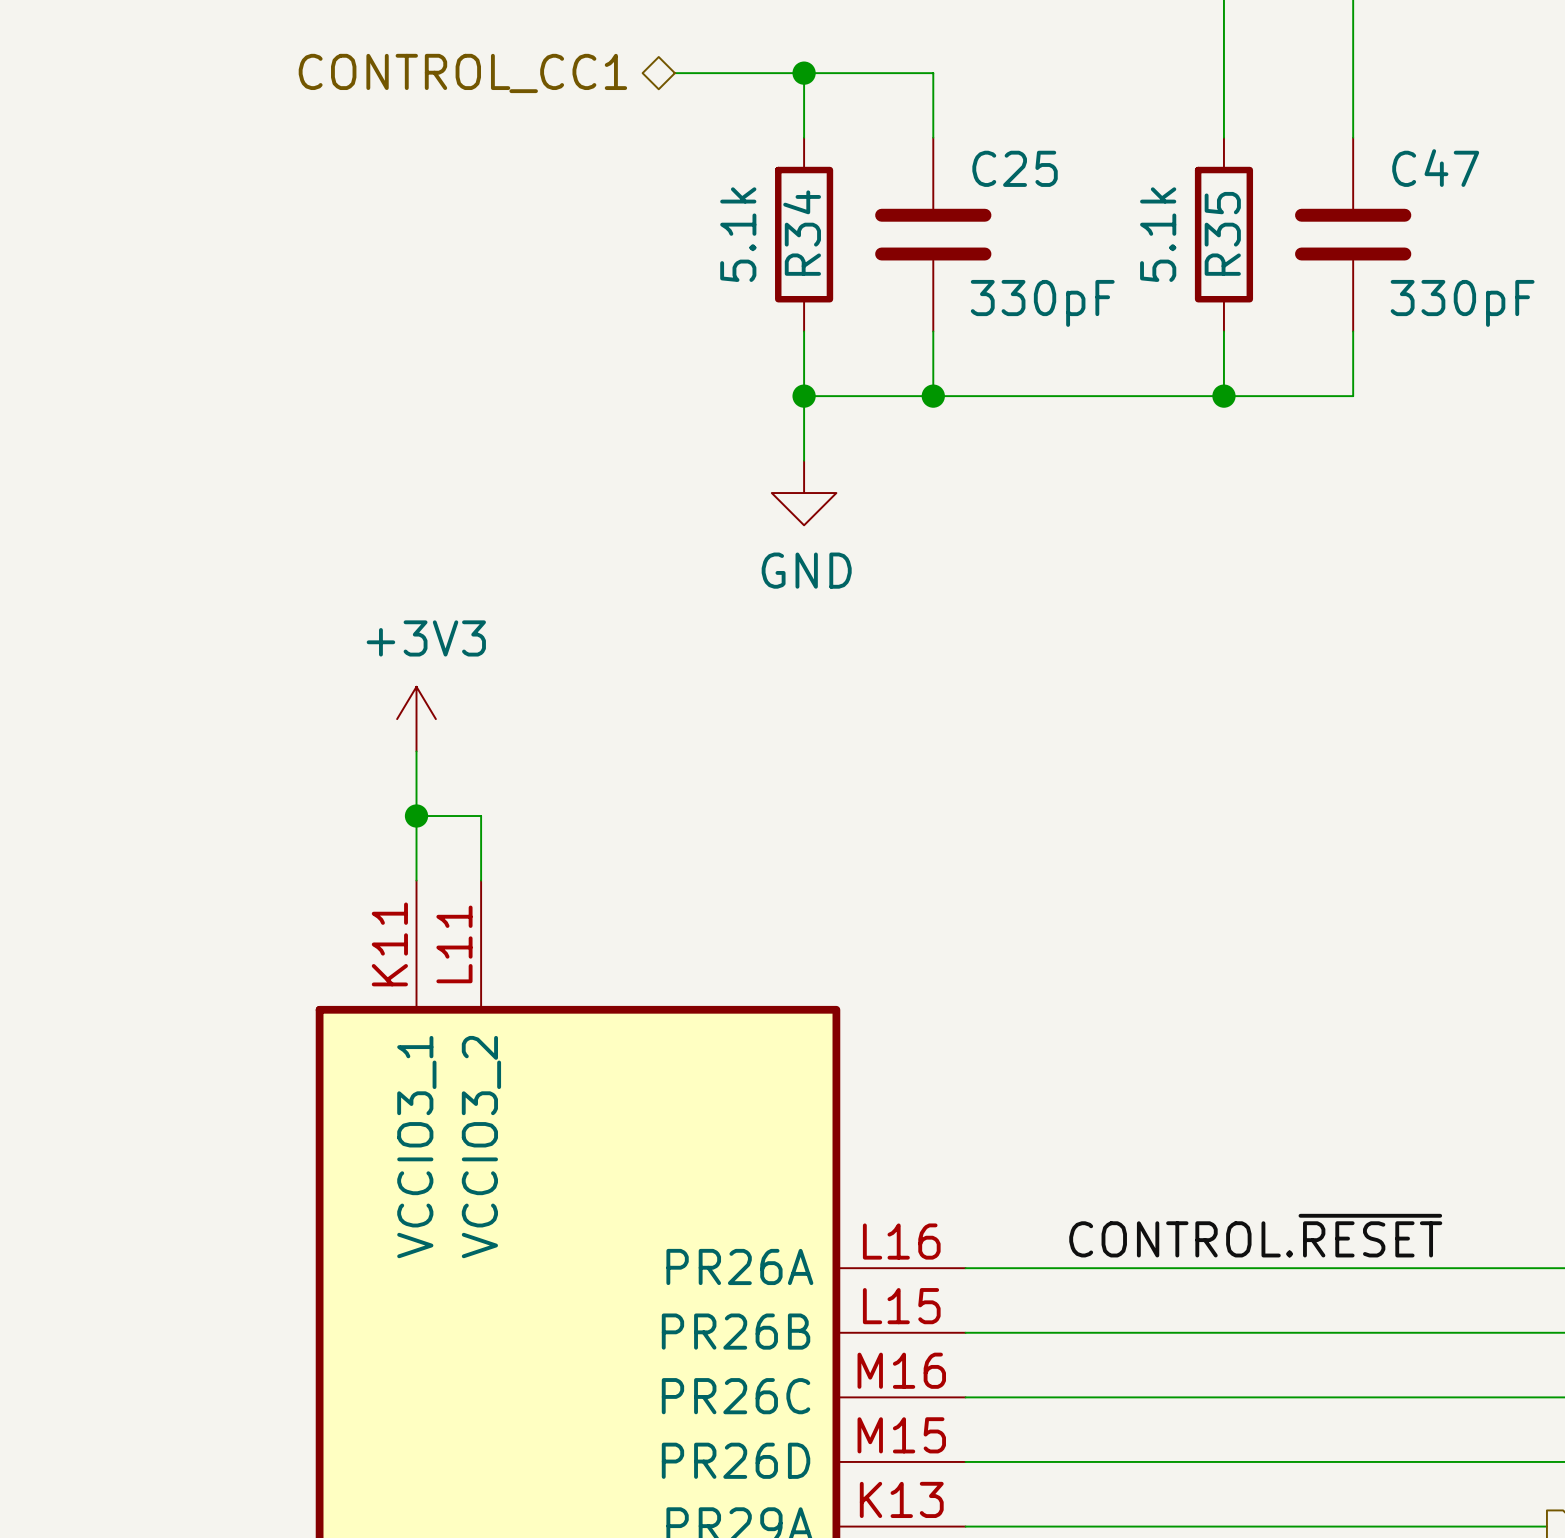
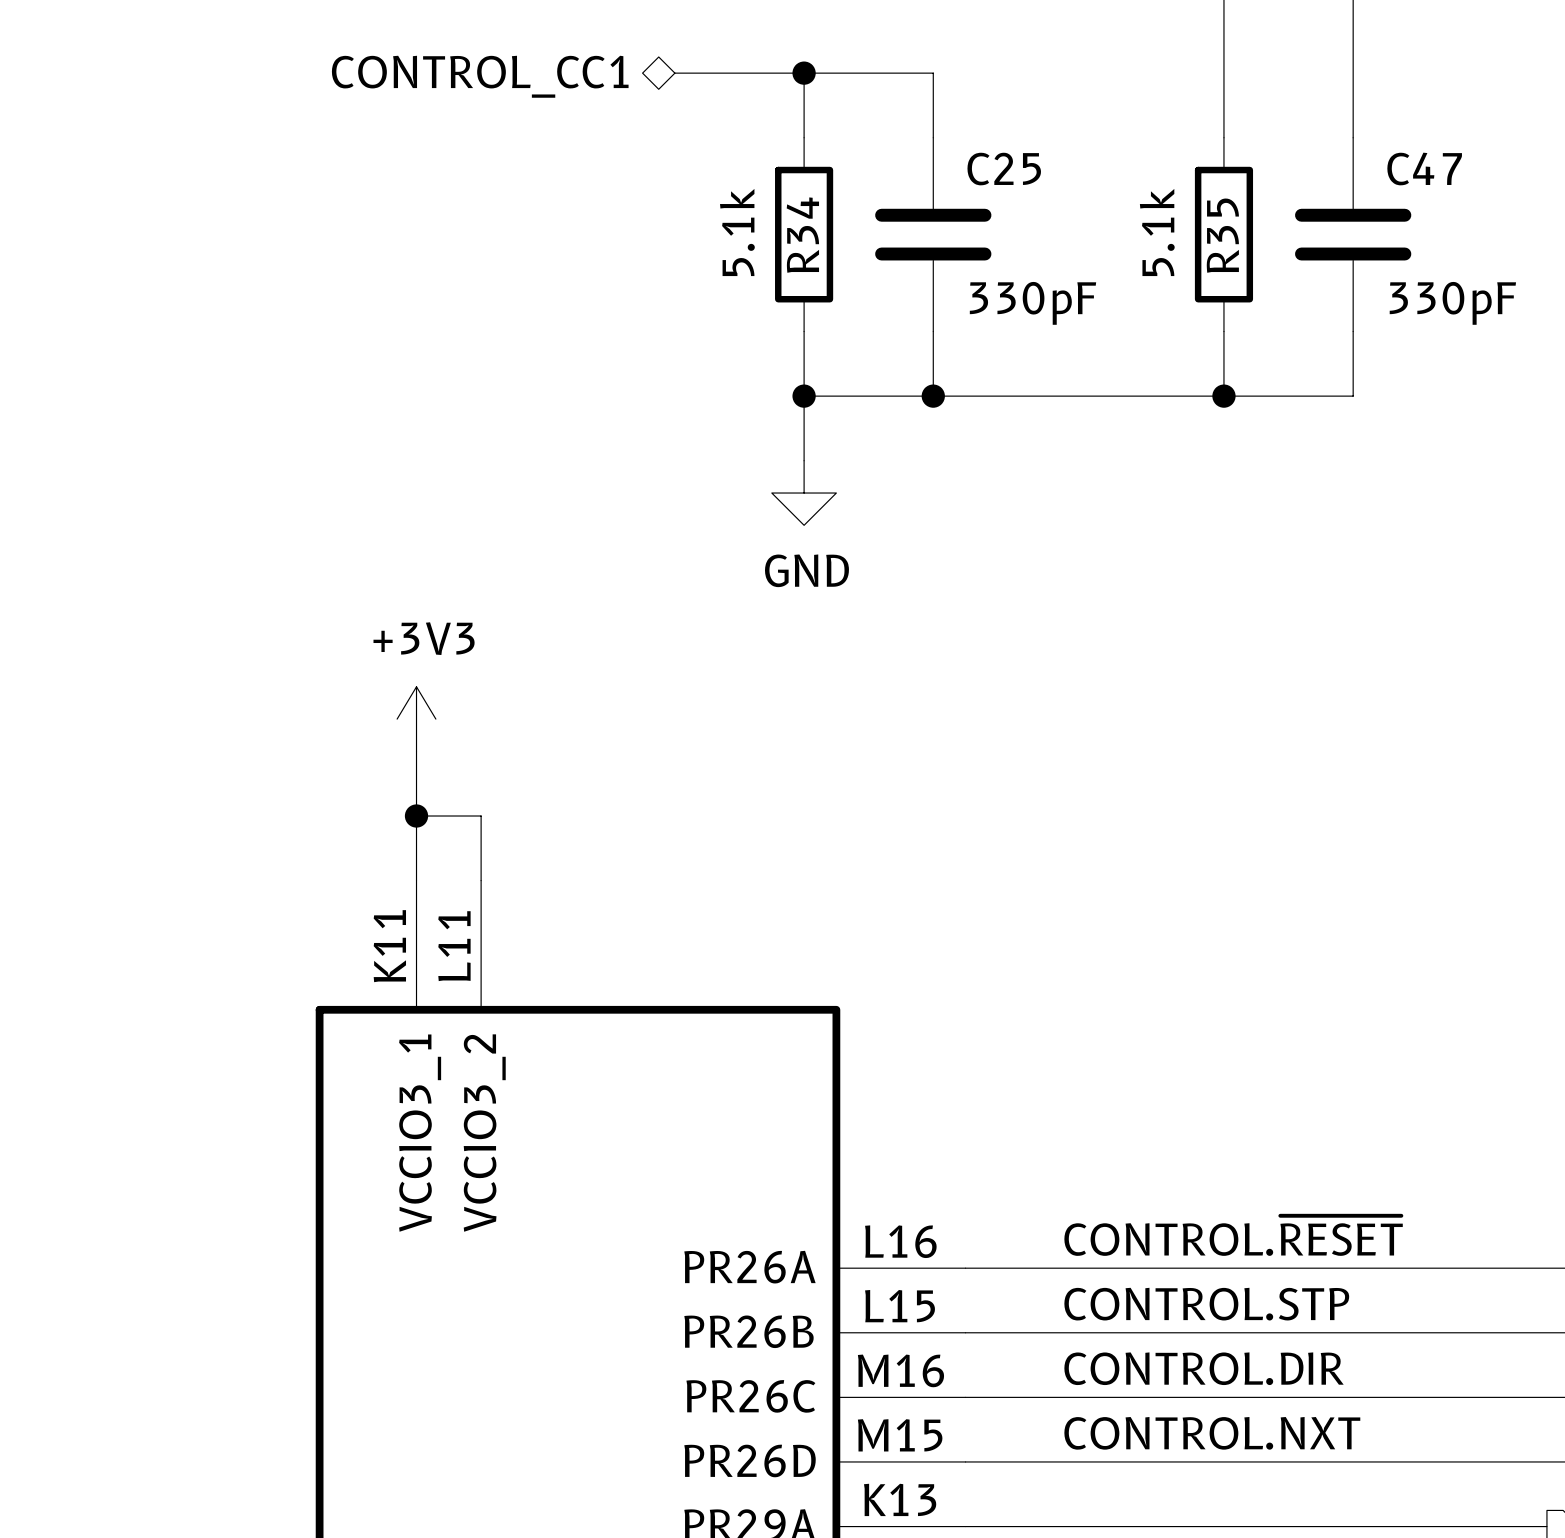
label: none -> CONTROL.STP (1206, 1304)
label: none -> CONTROL.DIR (1204, 1368)
label: none -> CONTROL.NXT (1212, 1433)

